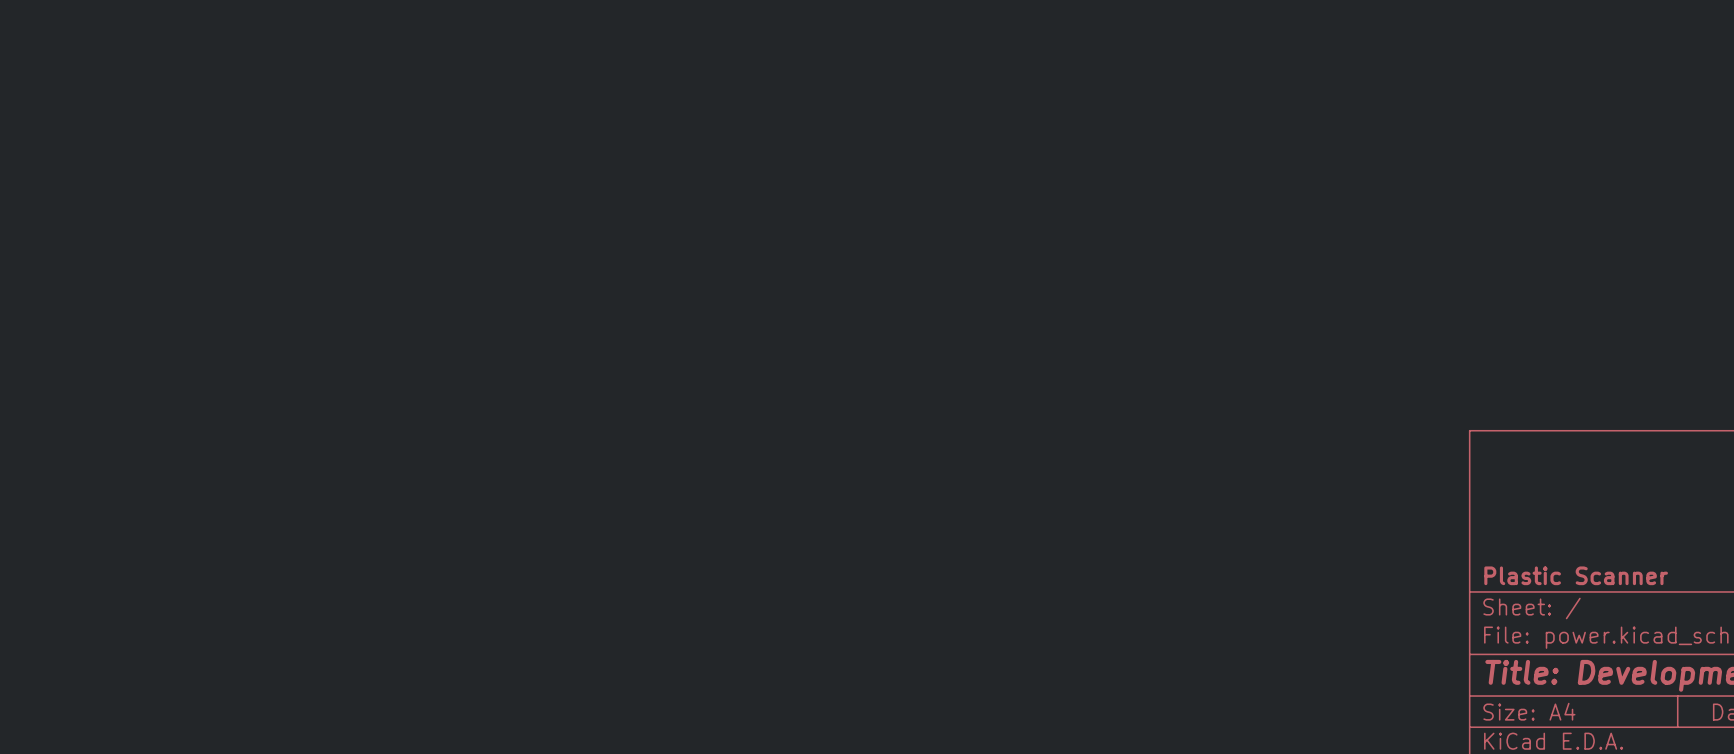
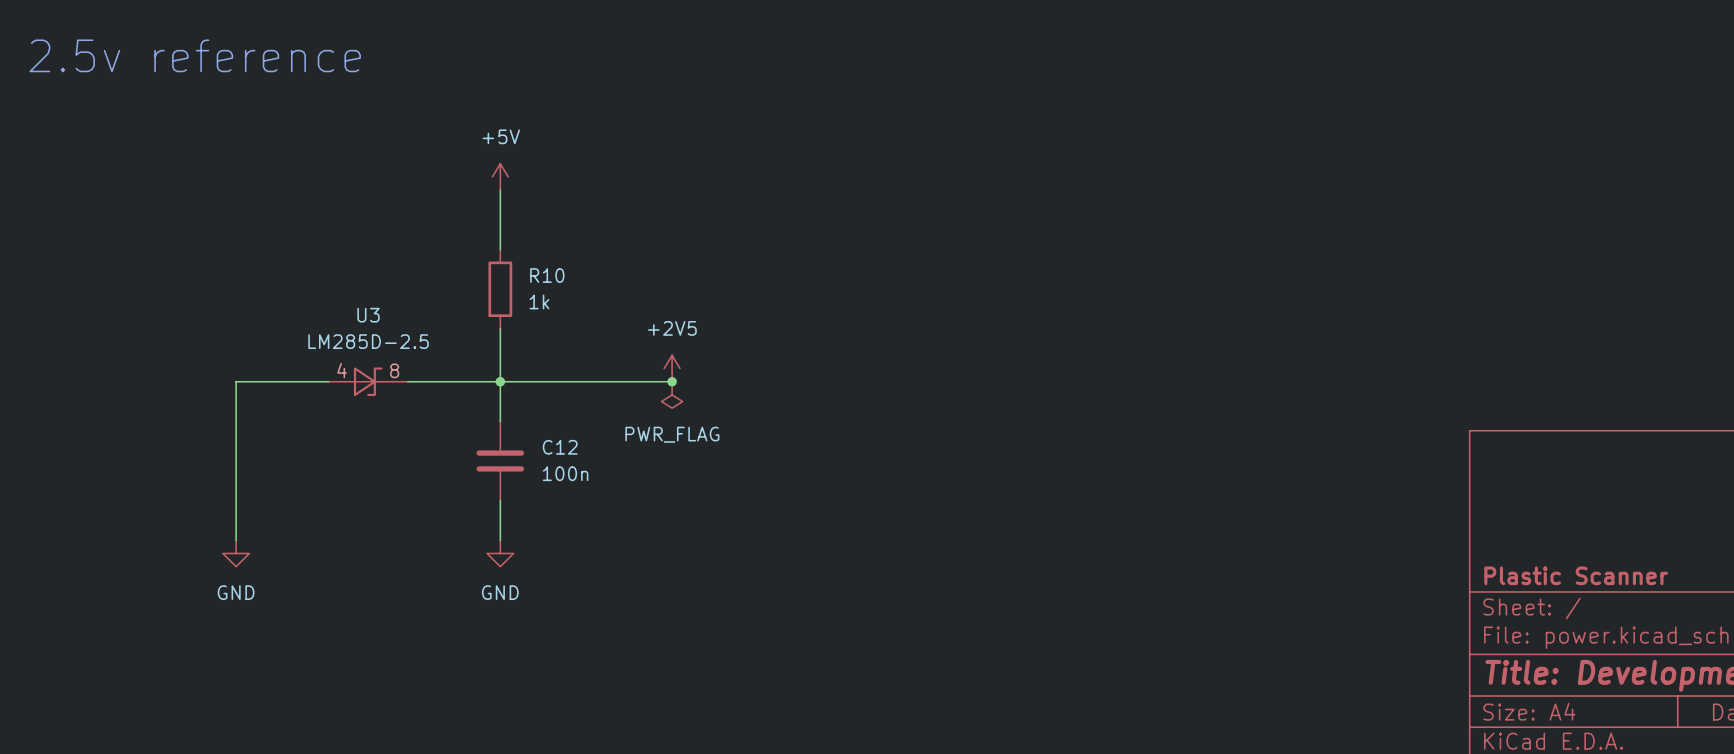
text: none -> 2.5v reference (195, 55)
power symbol: none -> +5V (500, 176)
wire: none -> (500, 190) (500, 249)
R10: none -> 1k (500, 289)
wire: none -> (500, 328) (500, 421)
power symbol: none -> +2V5 (672, 368)
wire: none -> (328, 381) (236, 381) (236, 540)
U3: none -> LM285D-2.5 (368, 381)
wire: none -> (407, 381) (672, 381)
junction: none -> (500, 381)
junction: none -> (672, 381)
power symbol: none -> PWR_FLAG (672, 394)
C12: none -> 100n (500, 461)
wire: none -> (500, 500) (500, 540)
power symbol: none -> GND (236, 553)
power symbol: none -> GND (500, 553)

